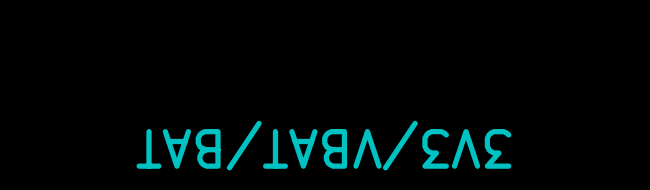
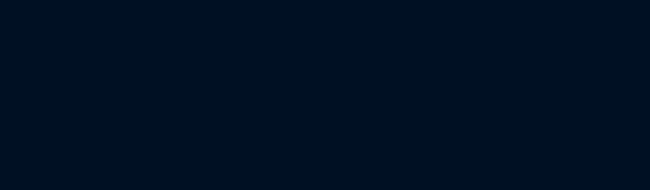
text: 3V3/VBAT/BAT (323, 145) -> none

